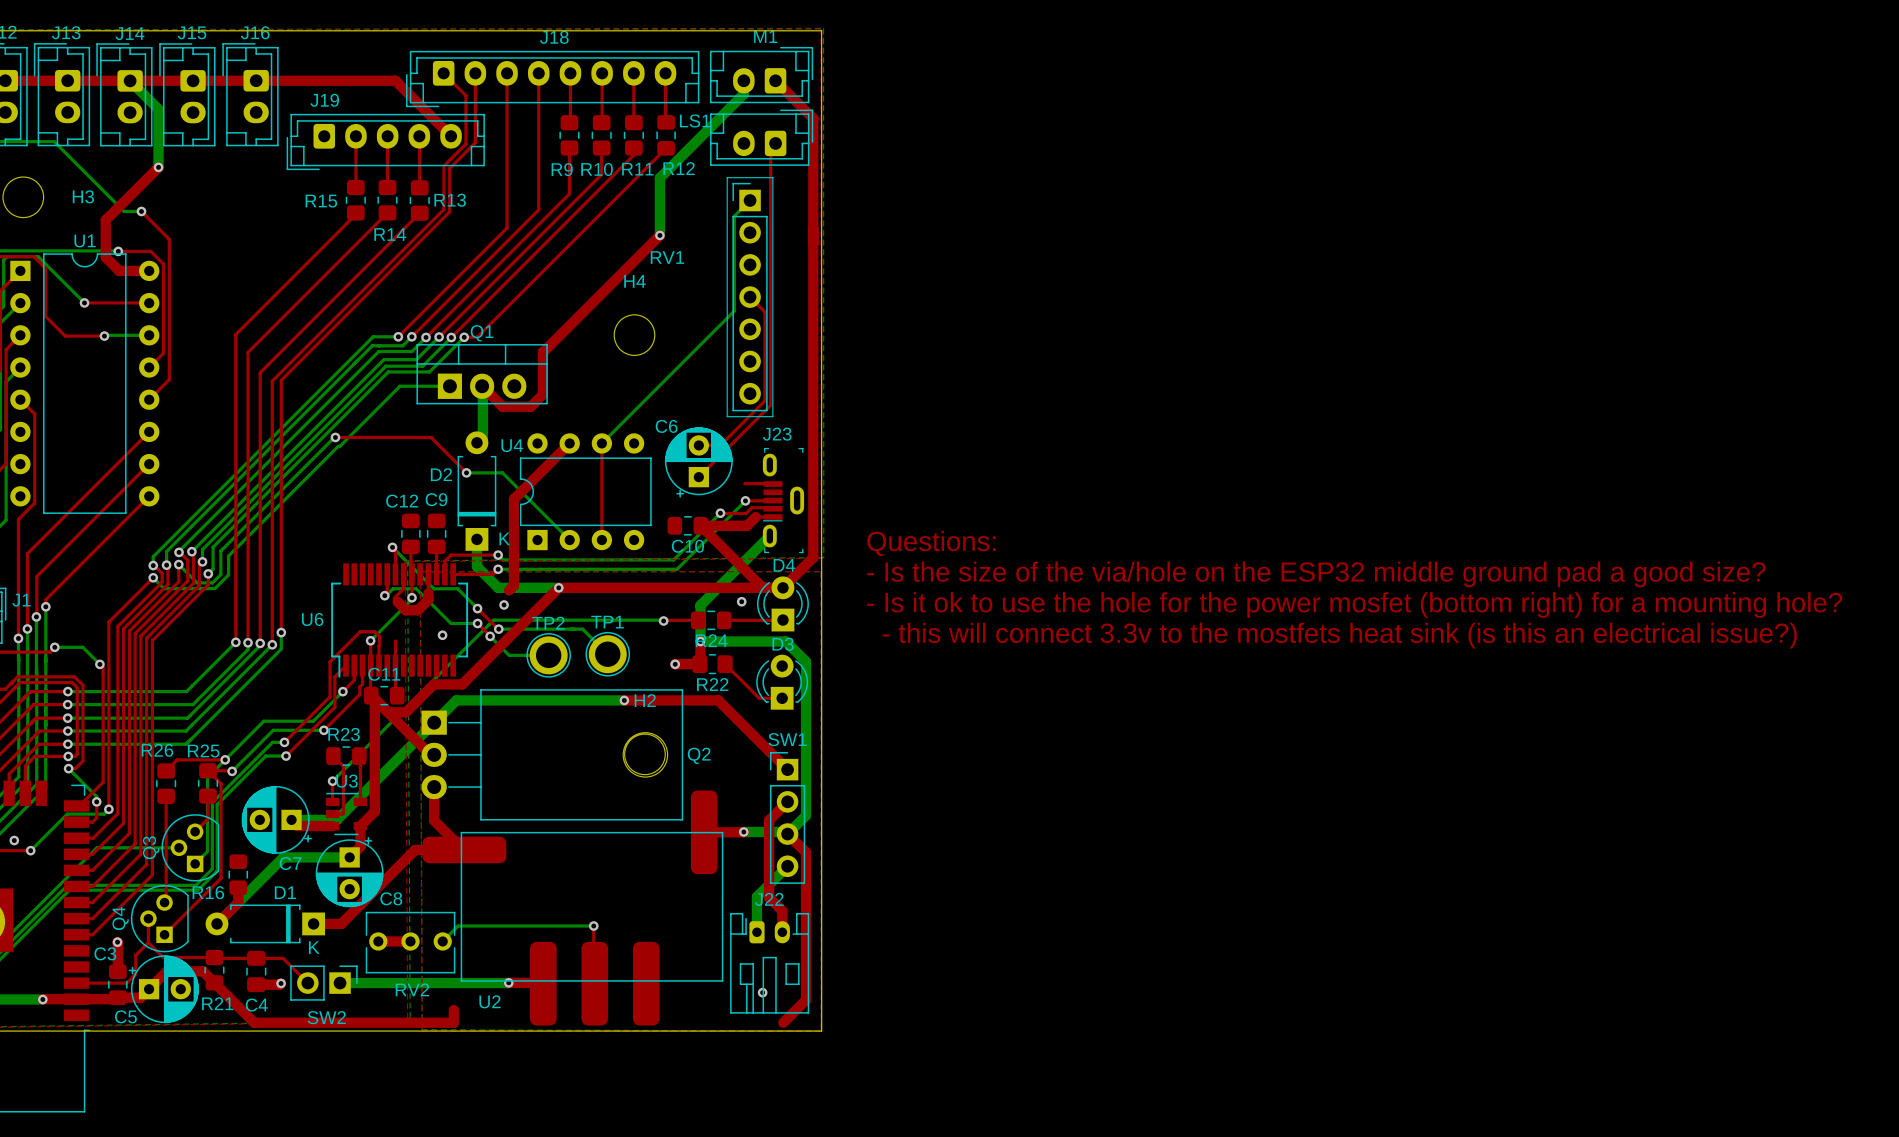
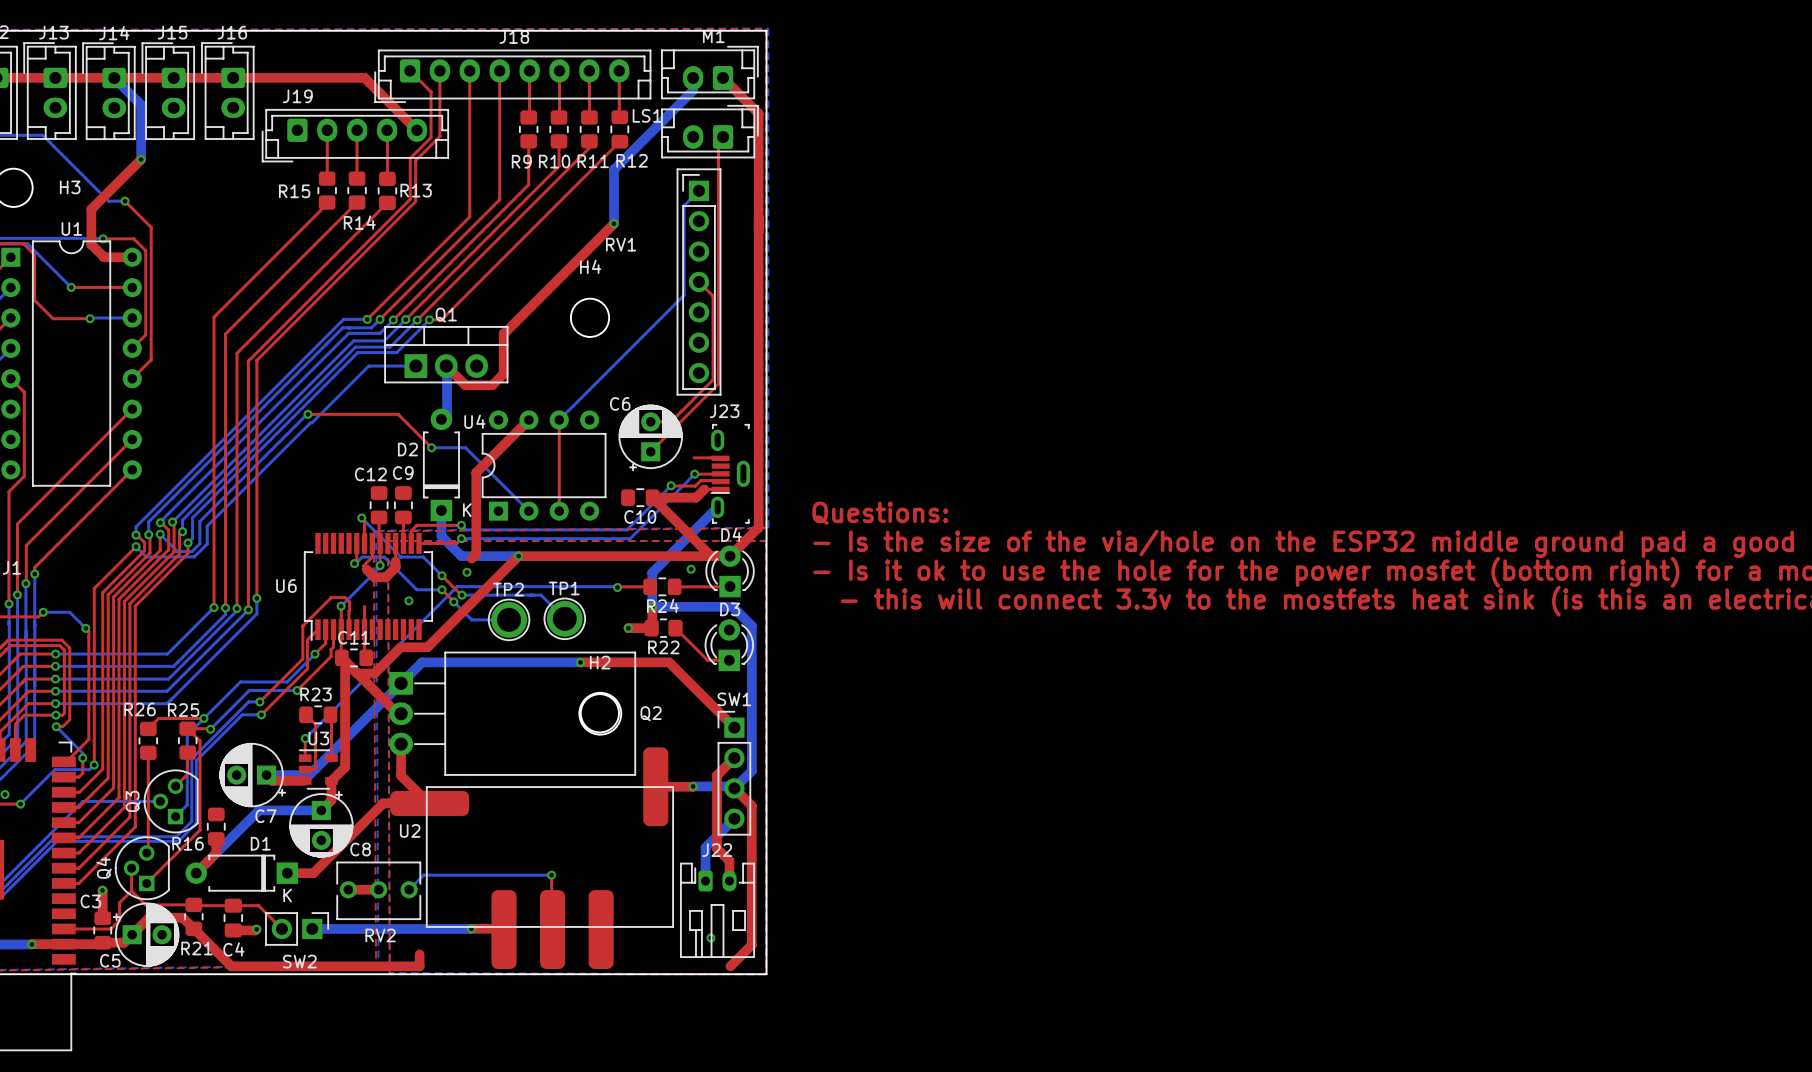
U2 name position: U2 (489, 1001) -> U2 (410, 830)

